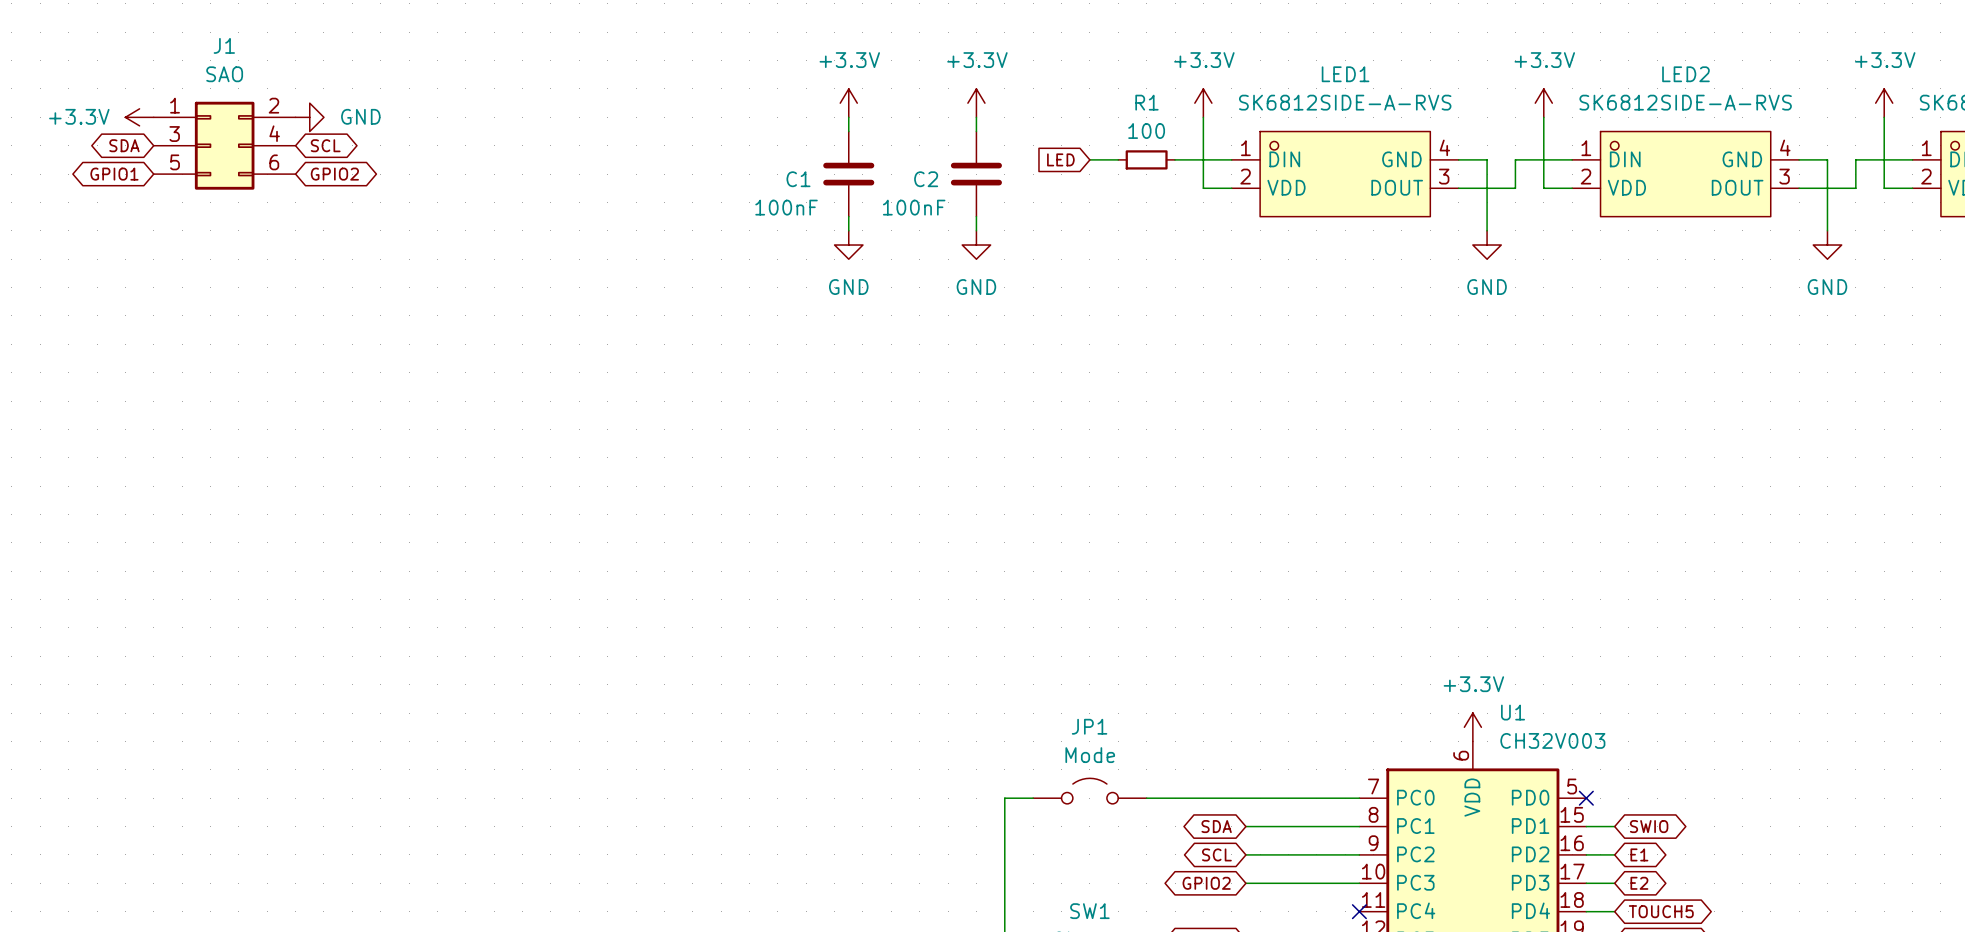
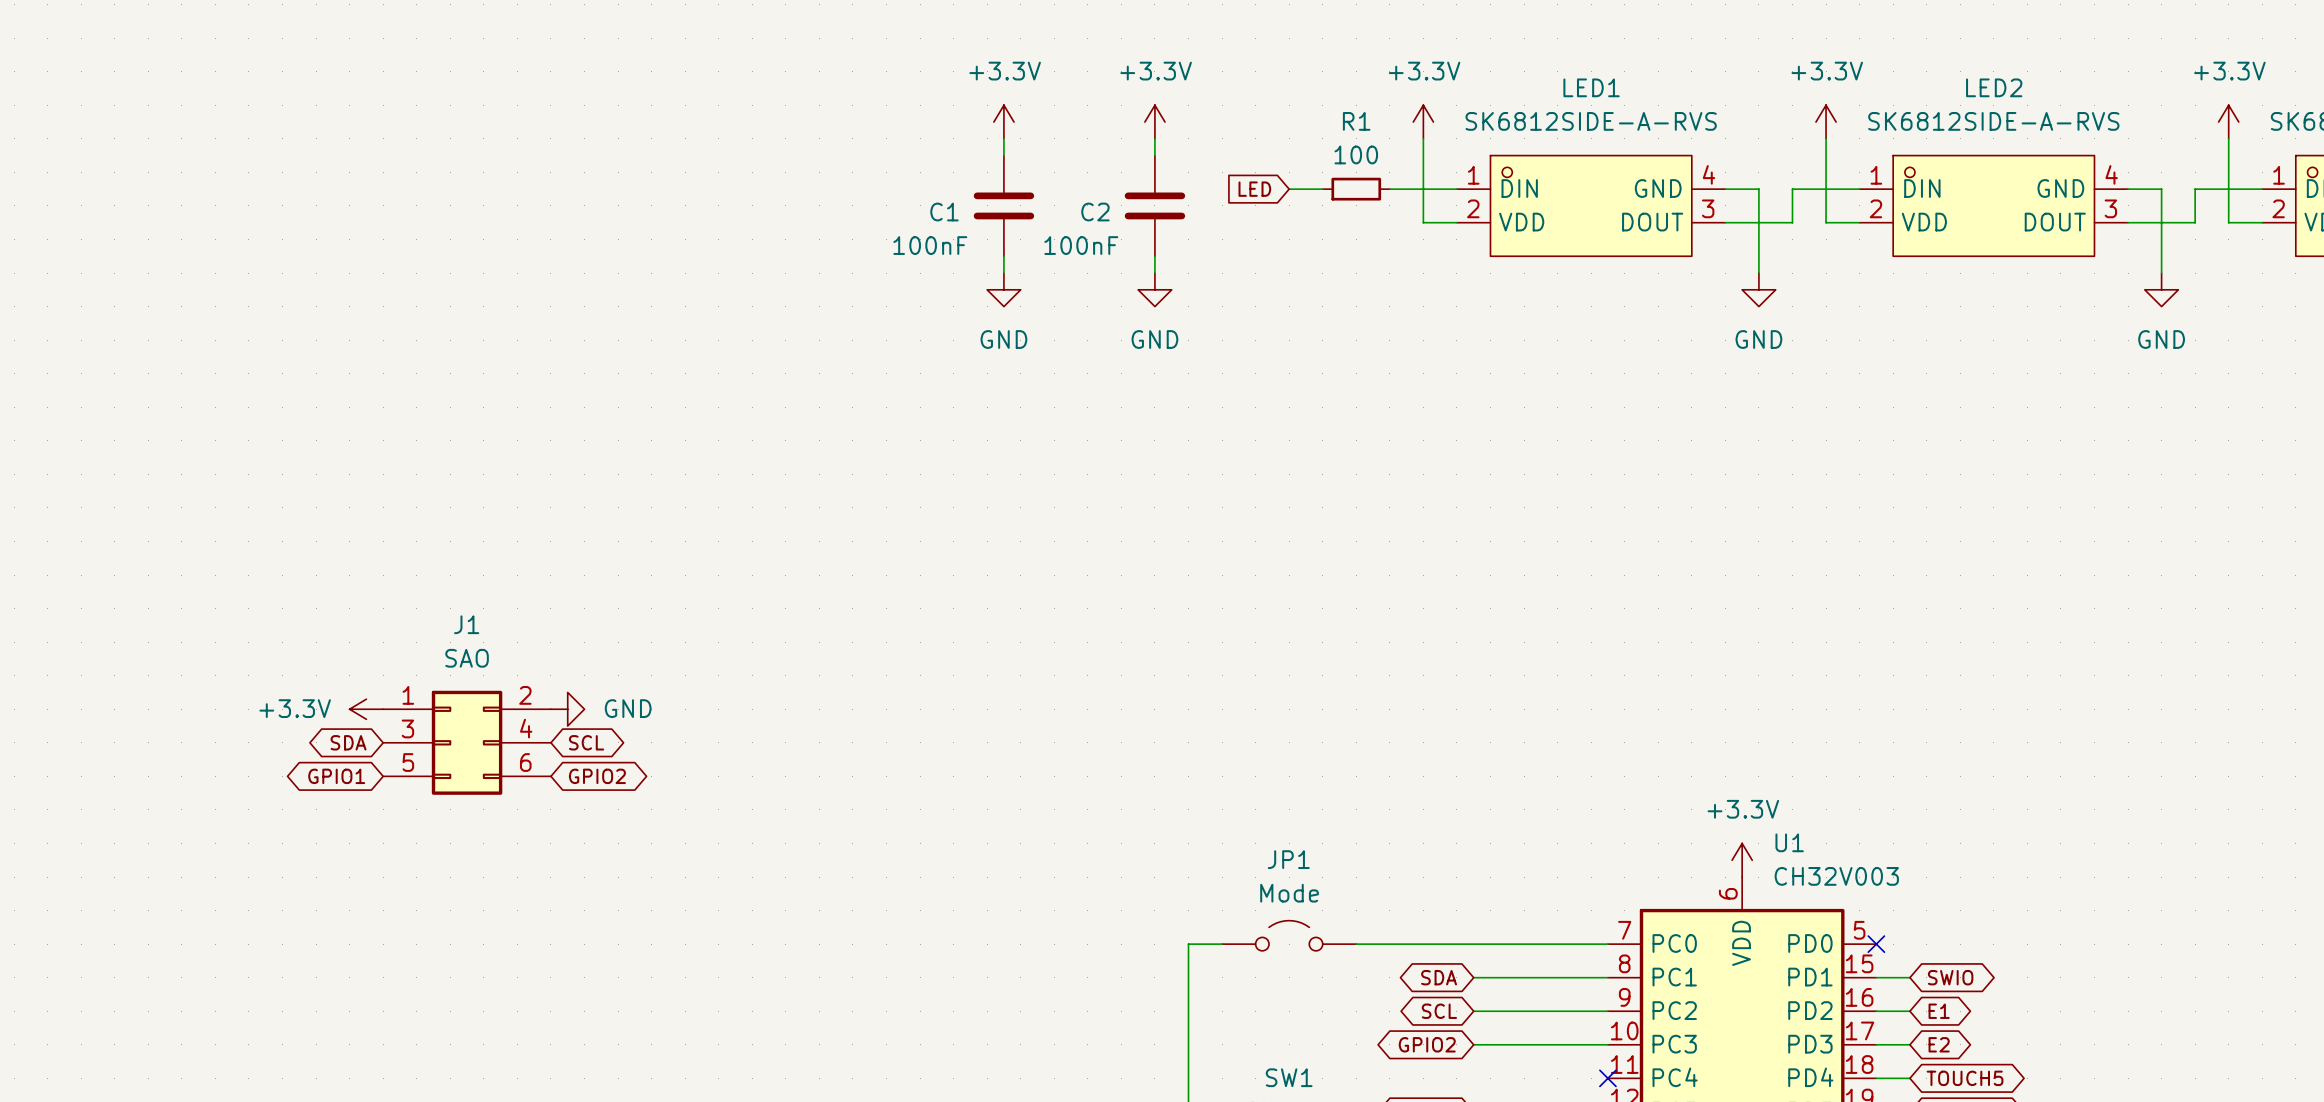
power symbol: +3.3V (139, 117) -> none
power symbol: GND (309, 117) -> none
global label: SDA (124, 145) -> none
J1 position: (224, 145) -> (467, 742)
global label: SCL (325, 145) -> none
global label: GPIO1 (114, 174) -> none
global label: GPIO2 (334, 174) -> none
power symbol: none -> +3.3V (366, 709)
power symbol: none -> GND (567, 709)
global label: none -> SDA (348, 742)
global label: none -> SCL (586, 742)
global label: none -> GPIO1 (336, 776)
global label: none -> GPIO2 (597, 776)

